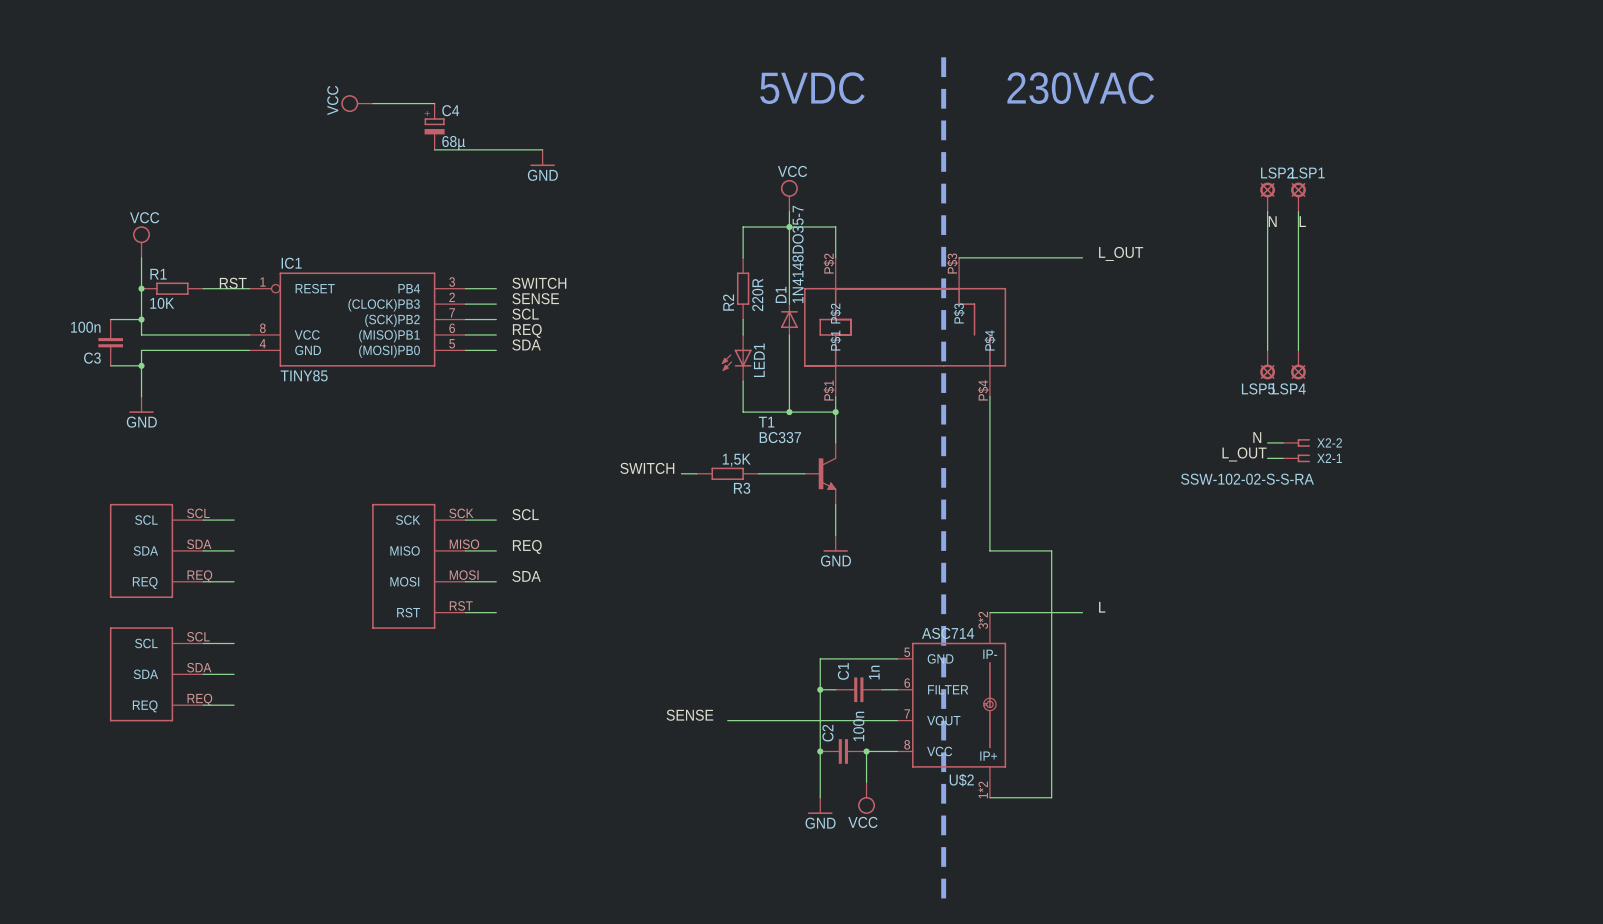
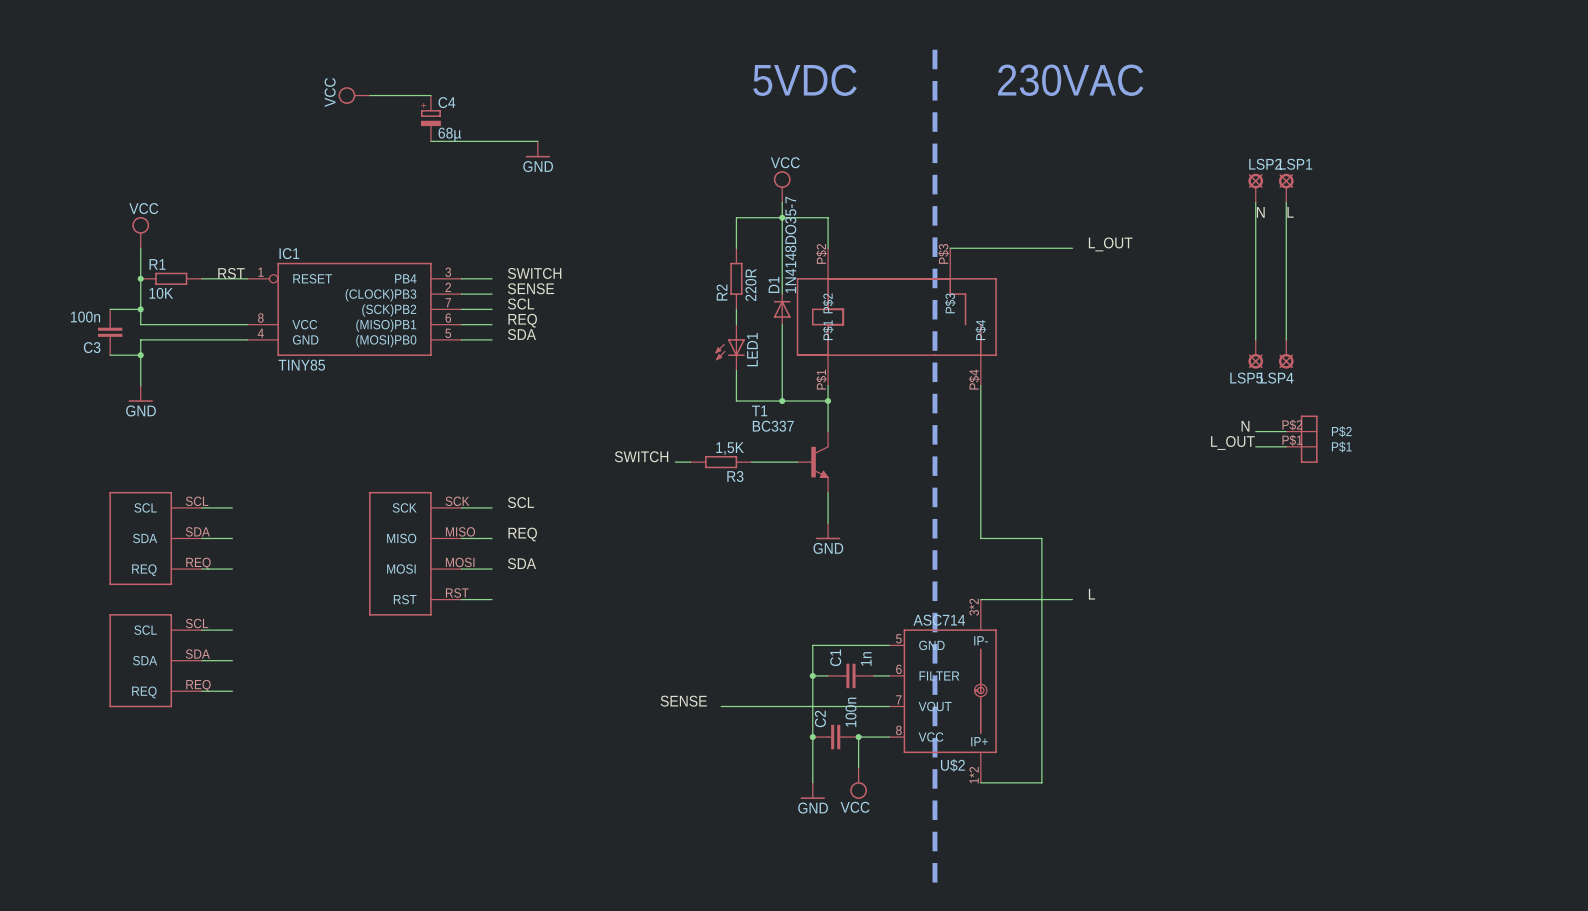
X2-2: (1296, 442) -> none
part: none -> (1301, 439)
X2-1: SSW-102-02-S-S-RA (1296, 458) -> none

